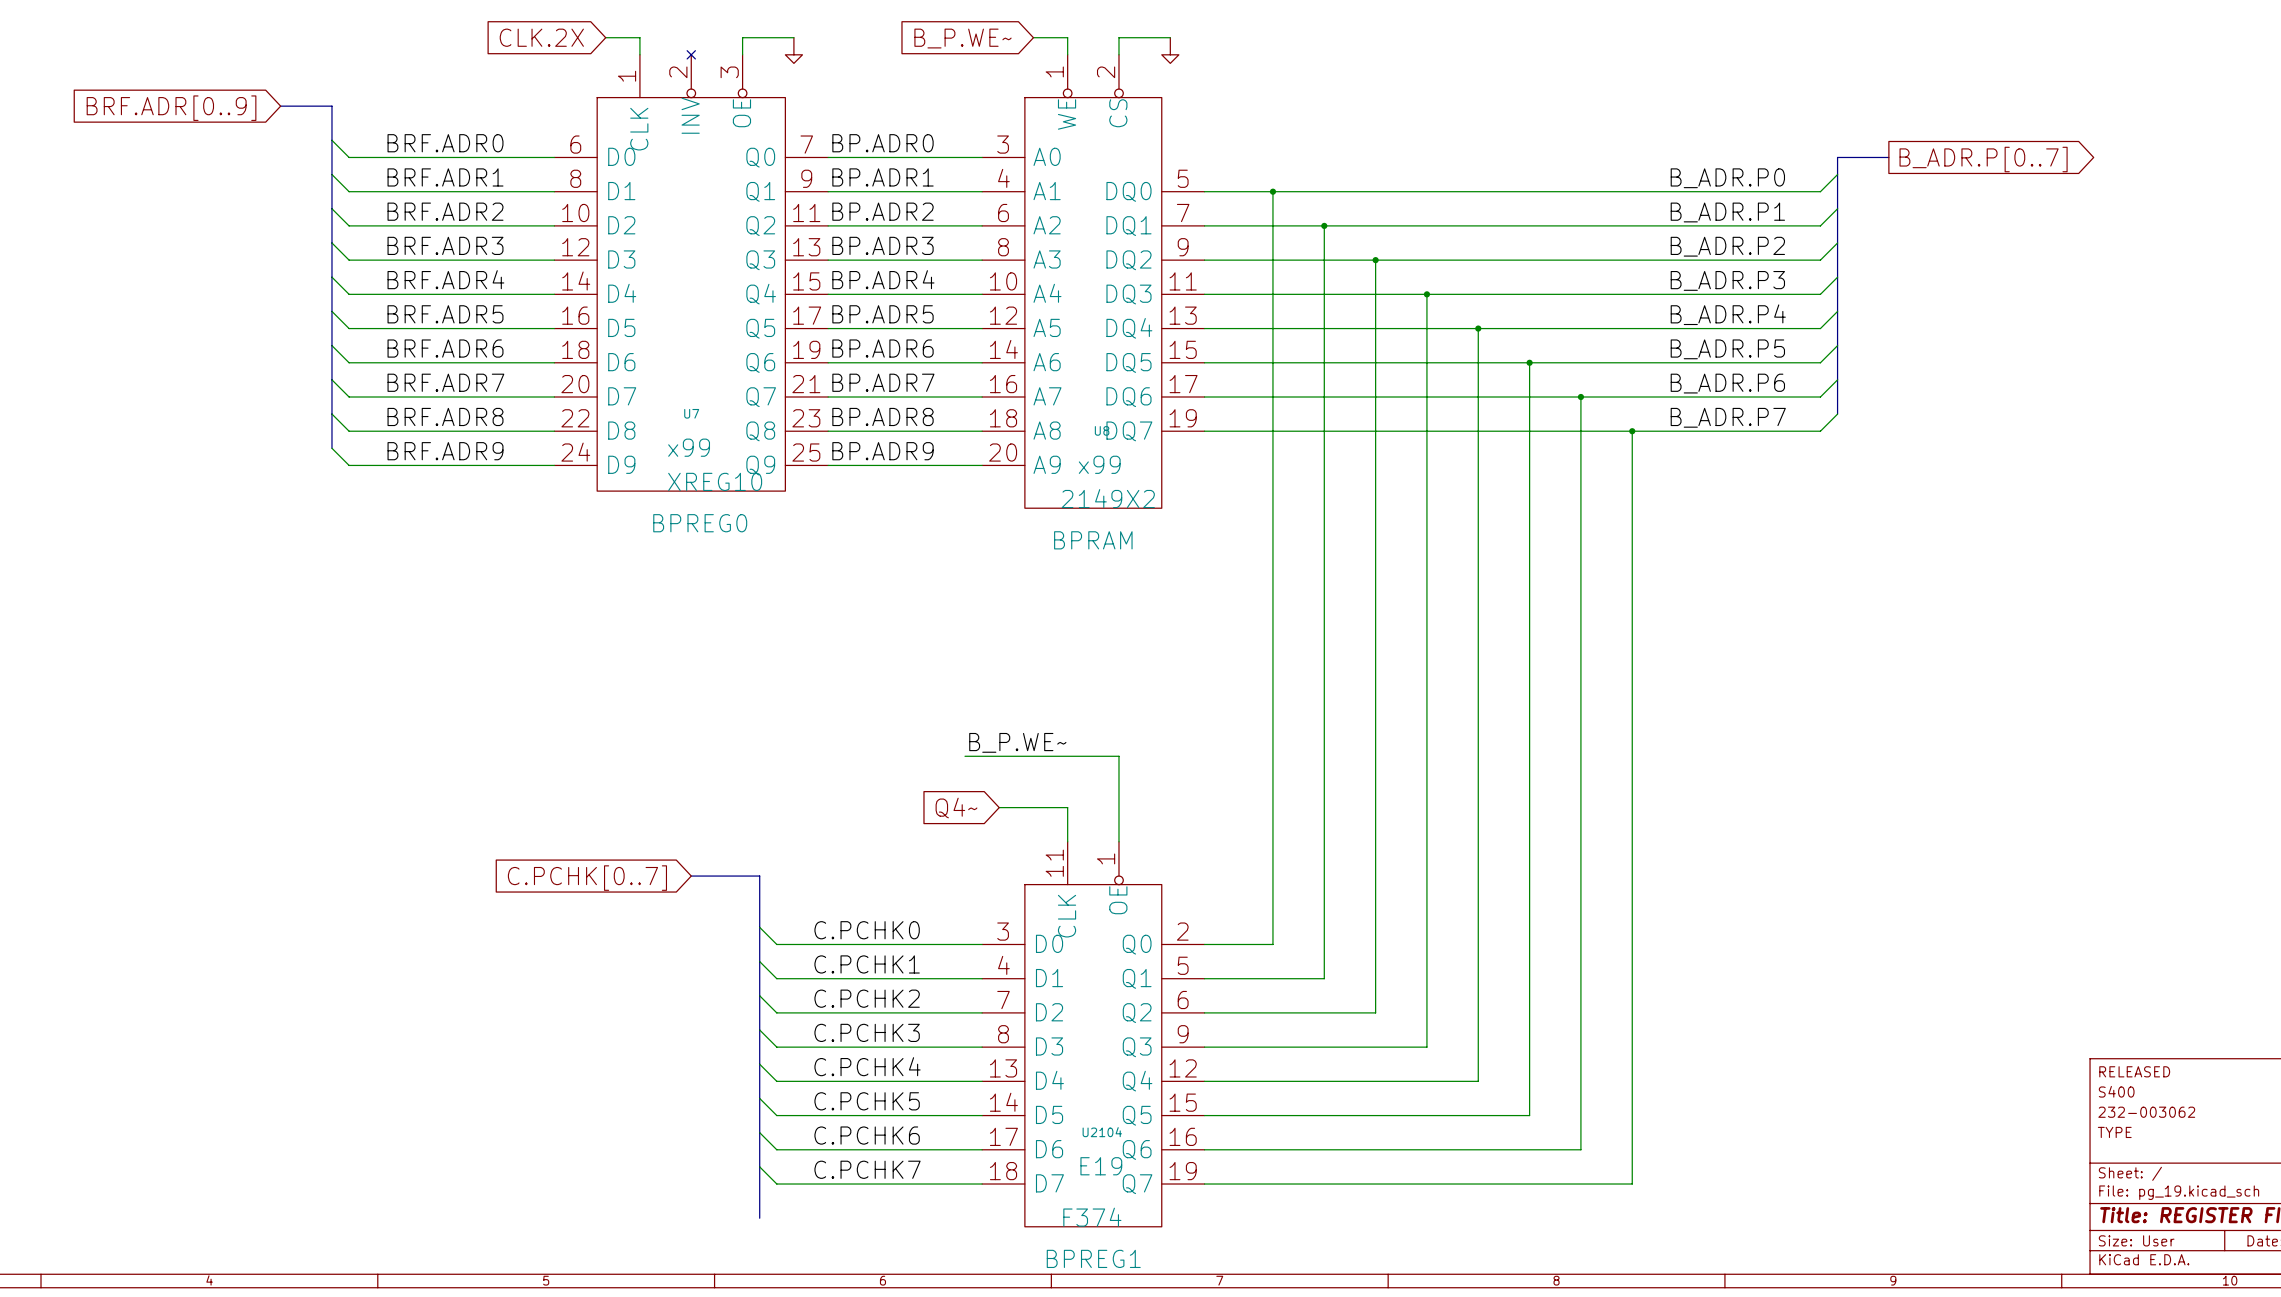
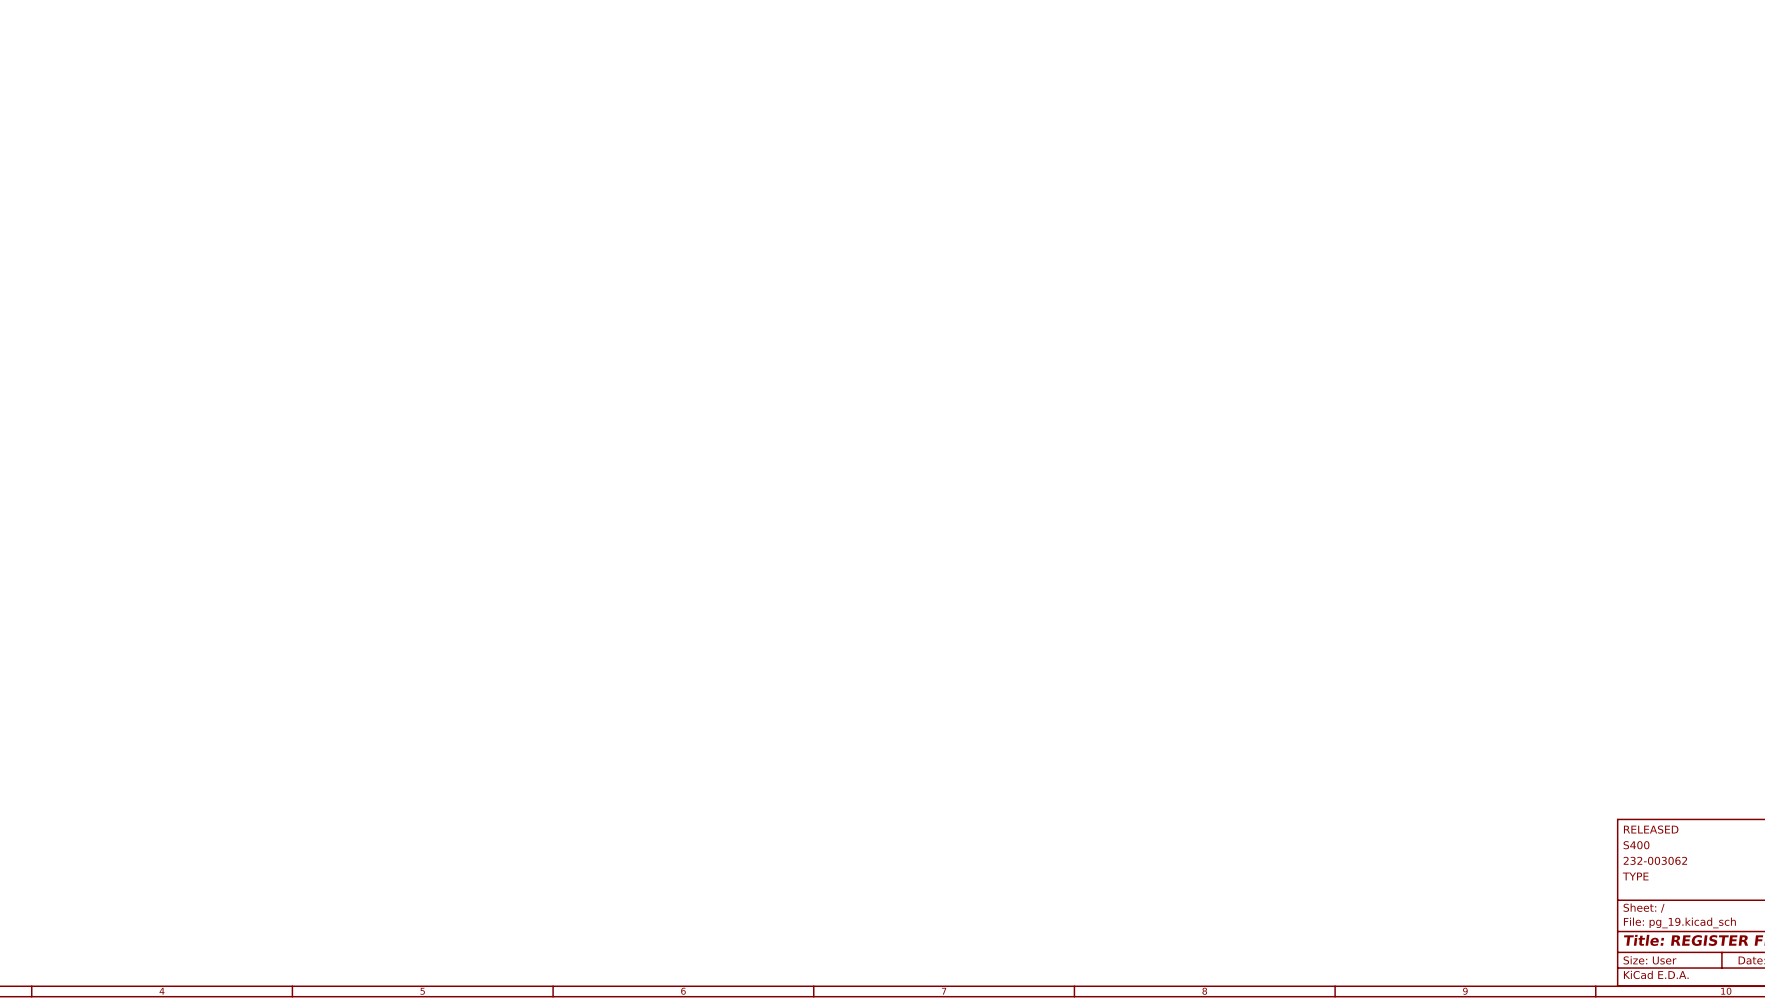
global label: CLK.2X (541, 37) -> none
wire: (605, 37) (639, 37) (639, 54) -> none
wire: (793, 37) (742, 37) (742, 54) -> none
wire: (1033, 37) (1067, 37) (1067, 54) -> none
wire: (1170, 37) (1118, 37) (1118, 54) -> none
global label: B_P.WE~ (963, 38) -> none
power symbol: (793, 50) -> none
power symbol: (1170, 50) -> none
no-connect mark: (691, 54) -> none
bus: (280, 106) (331, 106) (331, 448) -> none
global label: BRF.ADR[0..9] (171, 108) -> none
wire: (331, 140) (349, 157) (554, 157) -> none
label: BRF.ADR0 (445, 143) -> none
label: BP.ADR0 (882, 143) -> none
wire: (828, 157) (982, 157) -> none
bus: (1888, 157) (1837, 157) (1837, 414) -> none
global label: B_ADR.P[0..7] (1983, 159) -> none
wire: (331, 174) (349, 191) (554, 191) -> none
wire: (1837, 174) (1820, 191) (1204, 191) -> none
label: BRF.ADR1 (445, 177) -> none
label: BP.ADR1 (882, 177) -> none
label: B_ADR.P0 (1727, 178) -> none
wire: (828, 191) (982, 191) -> none
wire: (1272, 191) (1272, 944) (1204, 944) -> none
junction: (1272, 191) -> none
wire: (331, 208) (349, 225) (554, 225) -> none
wire: (1837, 208) (1820, 225) (1204, 225) -> none
label: BRF.ADR2 (445, 211) -> none
label: BP.ADR2 (882, 211) -> none
label: B_ADR.P1 (1727, 212) -> none
wire: (828, 225) (982, 225) -> none
wire: (1324, 225) (1324, 978) (1204, 978) -> none
junction: (1324, 225) -> none
wire: (331, 243) (349, 260) (554, 260) -> none
wire: (1837, 243) (1820, 260) (1204, 260) -> none
label: BRF.ADR3 (445, 245) -> none
label: BP.ADR3 (882, 245) -> none
label: B_ADR.P2 (1727, 246) -> none
wire: (828, 260) (982, 260) -> none
wire: (1375, 260) (1375, 1012) (1204, 1012) -> none
junction: (1375, 260) -> none
U7: XREG10 (691, 272) -> none
wire: (331, 277) (349, 294) (554, 294) -> none
wire: (1837, 277) (1820, 294) (1204, 294) -> none
label: BRF.ADR4 (445, 279) -> none
label: BP.ADR4 (883, 279) -> none
label: B_ADR.P3 (1727, 280) -> none
U8: 2149X2 (1093, 281) -> none
wire: (828, 294) (982, 294) -> none
wire: (1426, 294) (1426, 1047) (1204, 1047) -> none
junction: (1426, 294) -> none
wire: (331, 311) (349, 328) (554, 328) -> none
wire: (1837, 311) (1820, 328) (1204, 328) -> none
label: BRF.ADR5 (445, 314) -> none
label: BP.ADR5 (882, 314) -> none
label: B_ADR.P4 (1728, 314) -> none
wire: (828, 328) (982, 328) -> none
wire: (1478, 328) (1478, 1081) (1204, 1081) -> none
junction: (1478, 328) -> none
wire: (331, 345) (349, 362) (554, 362) -> none
wire: (1837, 345) (1820, 362) (1204, 362) -> none
label: BRF.ADR6 (445, 348) -> none
label: BP.ADR6 (882, 348) -> none
label: B_ADR.P5 (1727, 349) -> none
wire: (828, 362) (982, 362) -> none
wire: (1529, 362) (1529, 1115) (1204, 1115) -> none
junction: (1529, 362) -> none
wire: (331, 379) (349, 397) (554, 397) -> none
wire: (1837, 379) (1820, 397) (1204, 397) -> none
label: BRF.ADR7 (445, 382) -> none
label: BP.ADR7 (883, 382) -> none
label: B_ADR.P6 (1727, 383) -> none
wire: (828, 397) (982, 397) -> none
wire: (1580, 397) (1580, 1149) (1204, 1149) -> none
junction: (1580, 397) -> none
wire: (331, 414) (349, 431) (554, 431) -> none
wire: (1837, 414) (1820, 431) (1204, 431) -> none
label: BRF.ADR8 (445, 416) -> none
label: BP.ADR8 (882, 416) -> none
label: B_ADR.P7 (1728, 417) -> none
wire: (828, 431) (982, 431) -> none
wire: (1632, 431) (1632, 1184) (1204, 1184) -> none
junction: (1632, 431) -> none
wire: (331, 448) (349, 465) (554, 465) -> none
label: BRF.ADR9 (445, 451) -> none
label: BP.ADR9 (882, 451) -> none
wire: (828, 465) (982, 465) -> none
label: B_P.WE~ (1017, 742) -> none
wire: (965, 756) (1118, 756) (1118, 841) -> none
wire: (999, 807) (1067, 807) (1067, 841) -> none
global label: Q4~ (956, 808) -> none
bus: (691, 876) (759, 876) (759, 1218) -> none
global label: C.PCHK[0..7] (587, 878) -> none
wire: (759, 927) (776, 944) (982, 944) -> none
label: C.PCHK0 (867, 930) -> none
wire: (759, 961) (776, 978) (982, 978) -> none
label: C.PCHK1 (867, 964) -> none
wire: (759, 995) (776, 1012) (982, 1012) -> none
label: C.PCHK2 (867, 998) -> none
wire: (759, 1030) (776, 1047) (982, 1047) -> none
label: C.PCHK3 (867, 1032) -> none
U2104: F374 (1093, 1034) -> none
wire: (759, 1064) (776, 1081) (982, 1081) -> none
label: C.PCHK4 (867, 1066) -> none
wire: (759, 1098) (776, 1115) (982, 1115) -> none
label: C.PCHK5 (867, 1101) -> none
wire: (759, 1132) (776, 1149) (982, 1149) -> none
label: C.PCHK6 (867, 1135) -> none
wire: (759, 1166) (776, 1184) (982, 1184) -> none
label: C.PCHK7 (867, 1169) -> none

